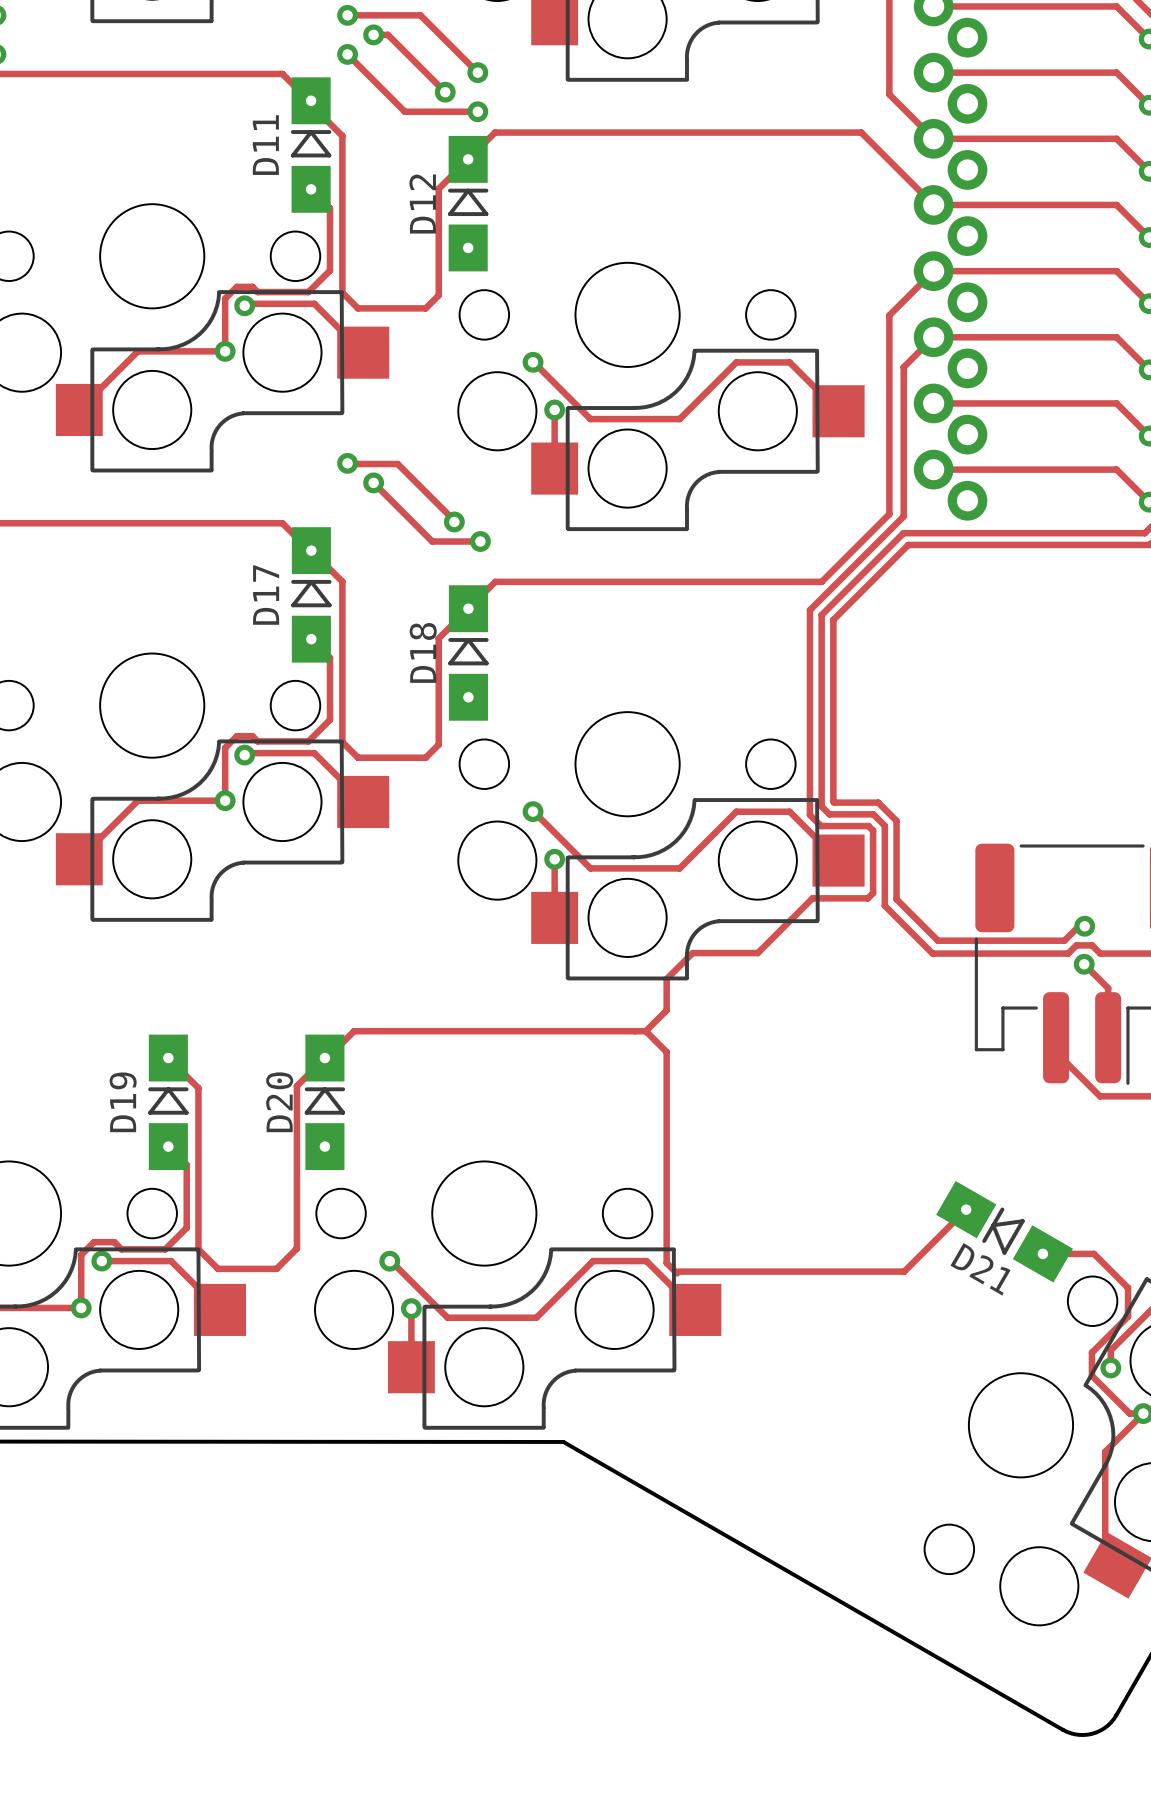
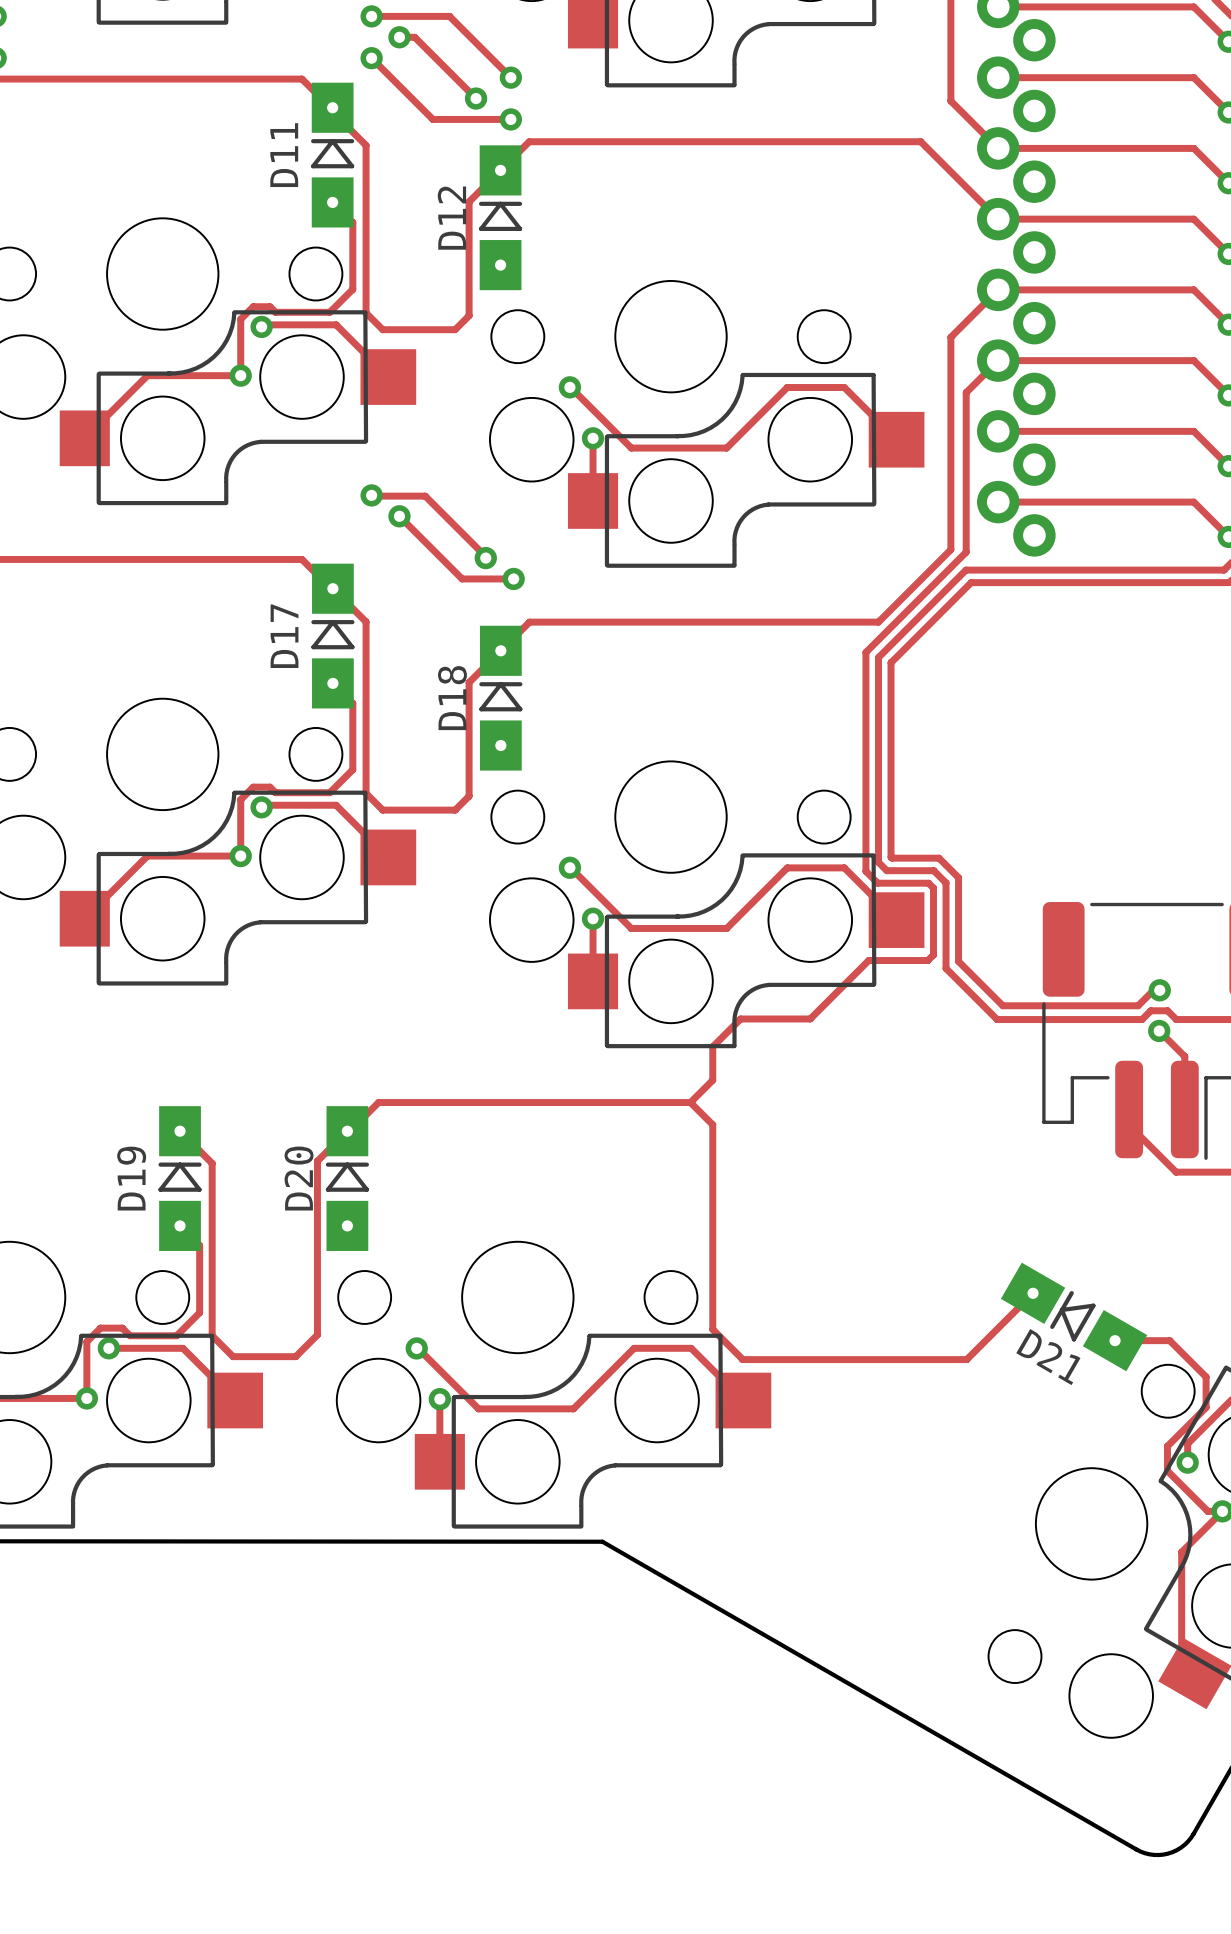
track: (666, 1243) (666, 1263) (677, 1273) -> (712, 1329) (742, 1359)
track: (678, 1271) (694, 1271) -> none

